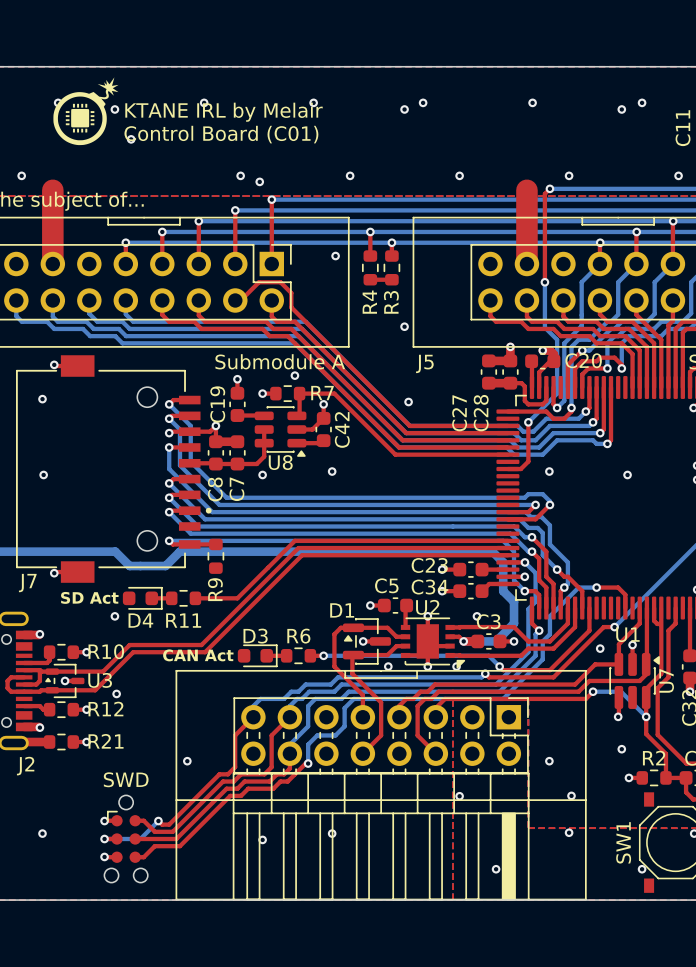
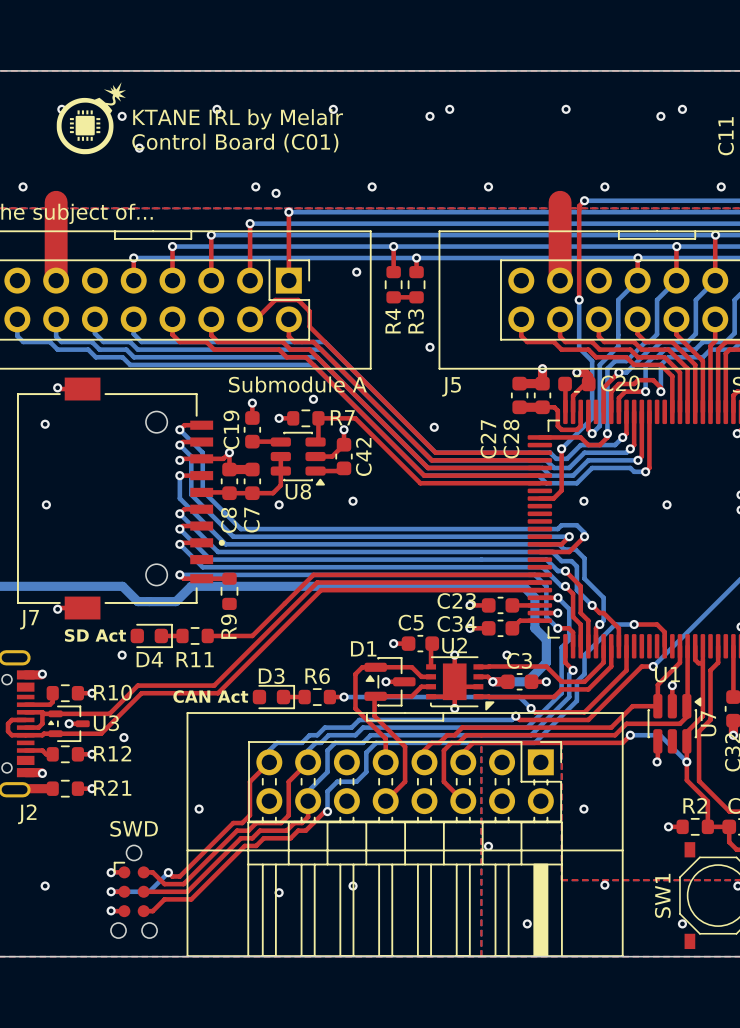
via: (600, 648) -> none
via: (388, 666) -> none
via: (456, 666) -> none
via: (621, 749) -> none
via: (571, 795) -> none

